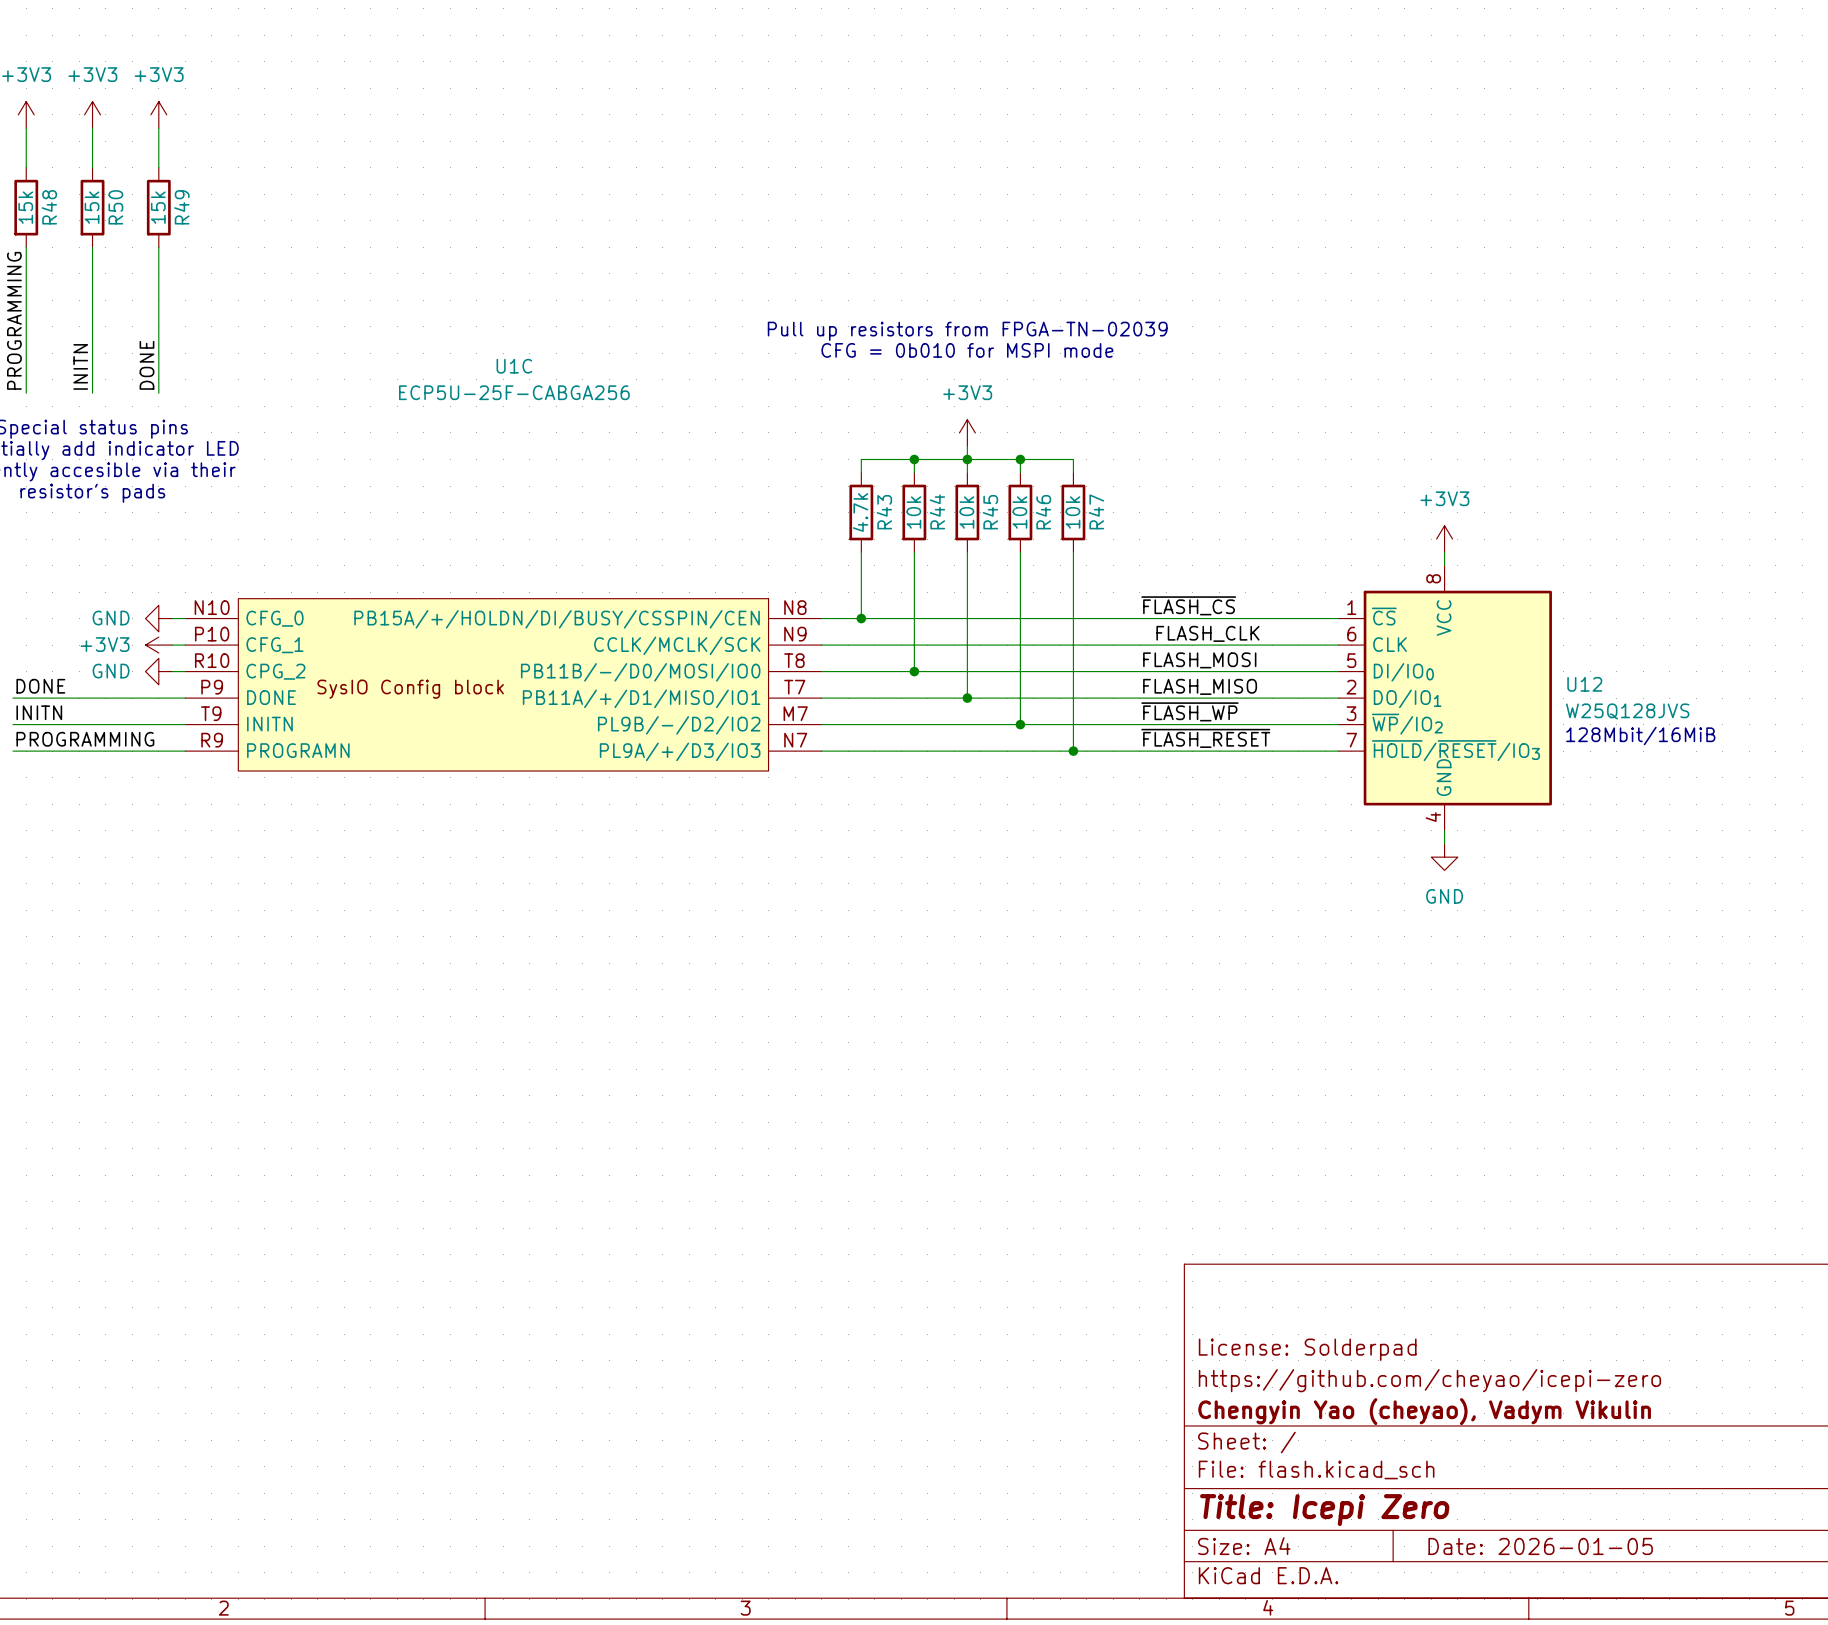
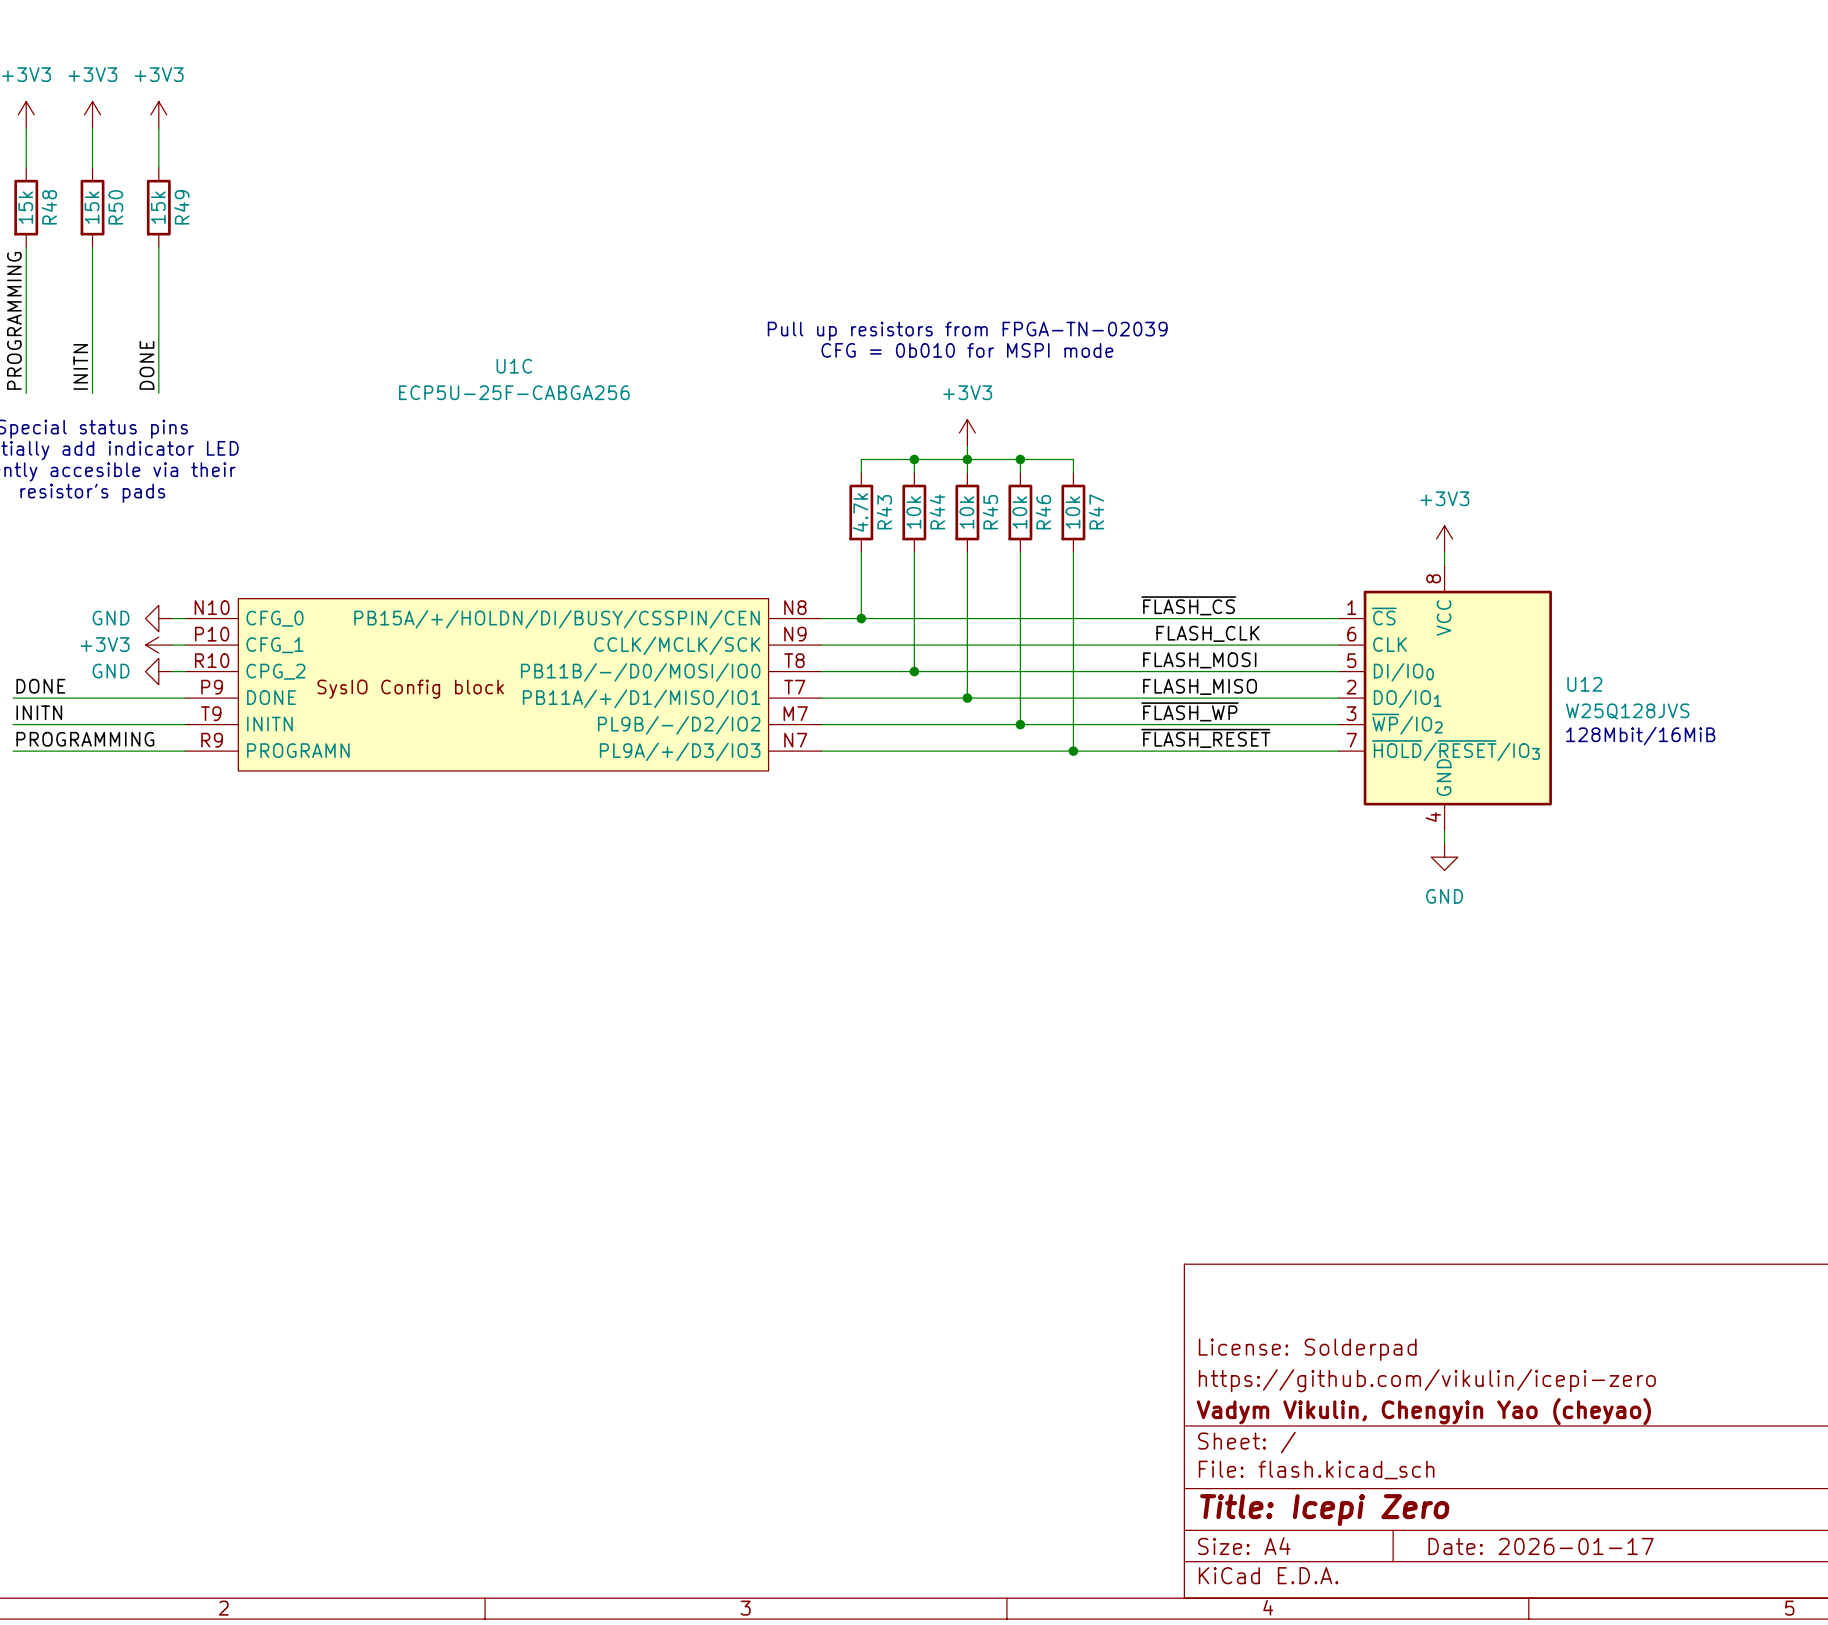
title block: https://github.com/cheyao/icepi-zero (1429, 1380) -> https://github.com/vikulin/icepi-zero (1427, 1380)
title block: Chengyin Yao (cheyao), Vadym Vikulin (1424, 1411) -> Vadym Vikulin, Chengyin Yao (cheyao) (1423, 1411)
title block: Date: 2026-01-05 (1540, 1546) -> Date: 2026-01-17 (1541, 1546)

